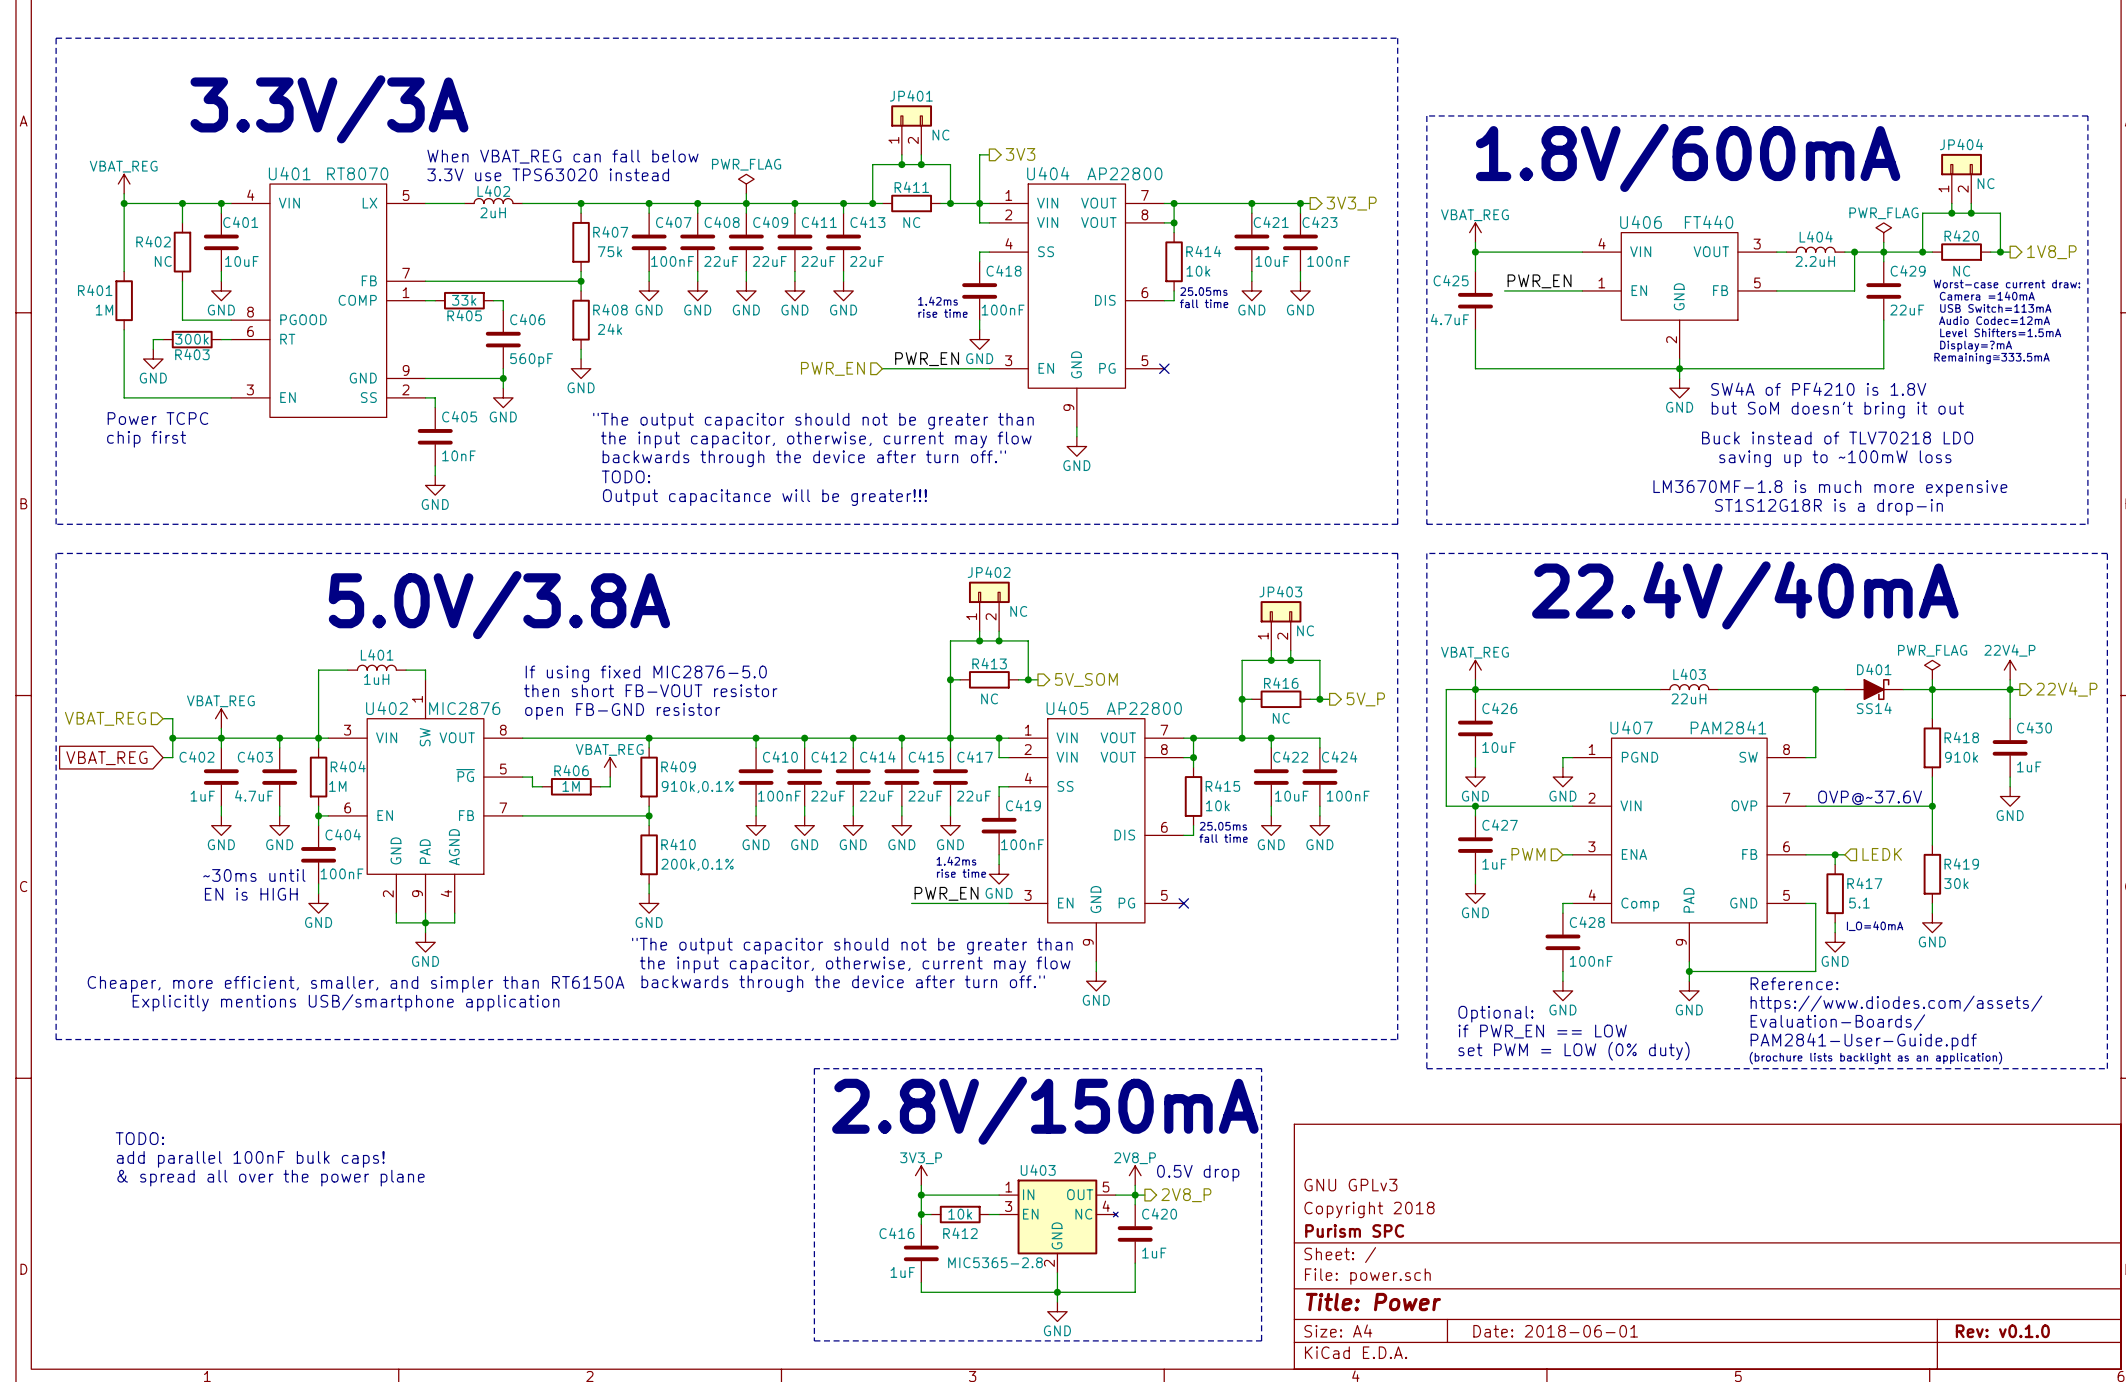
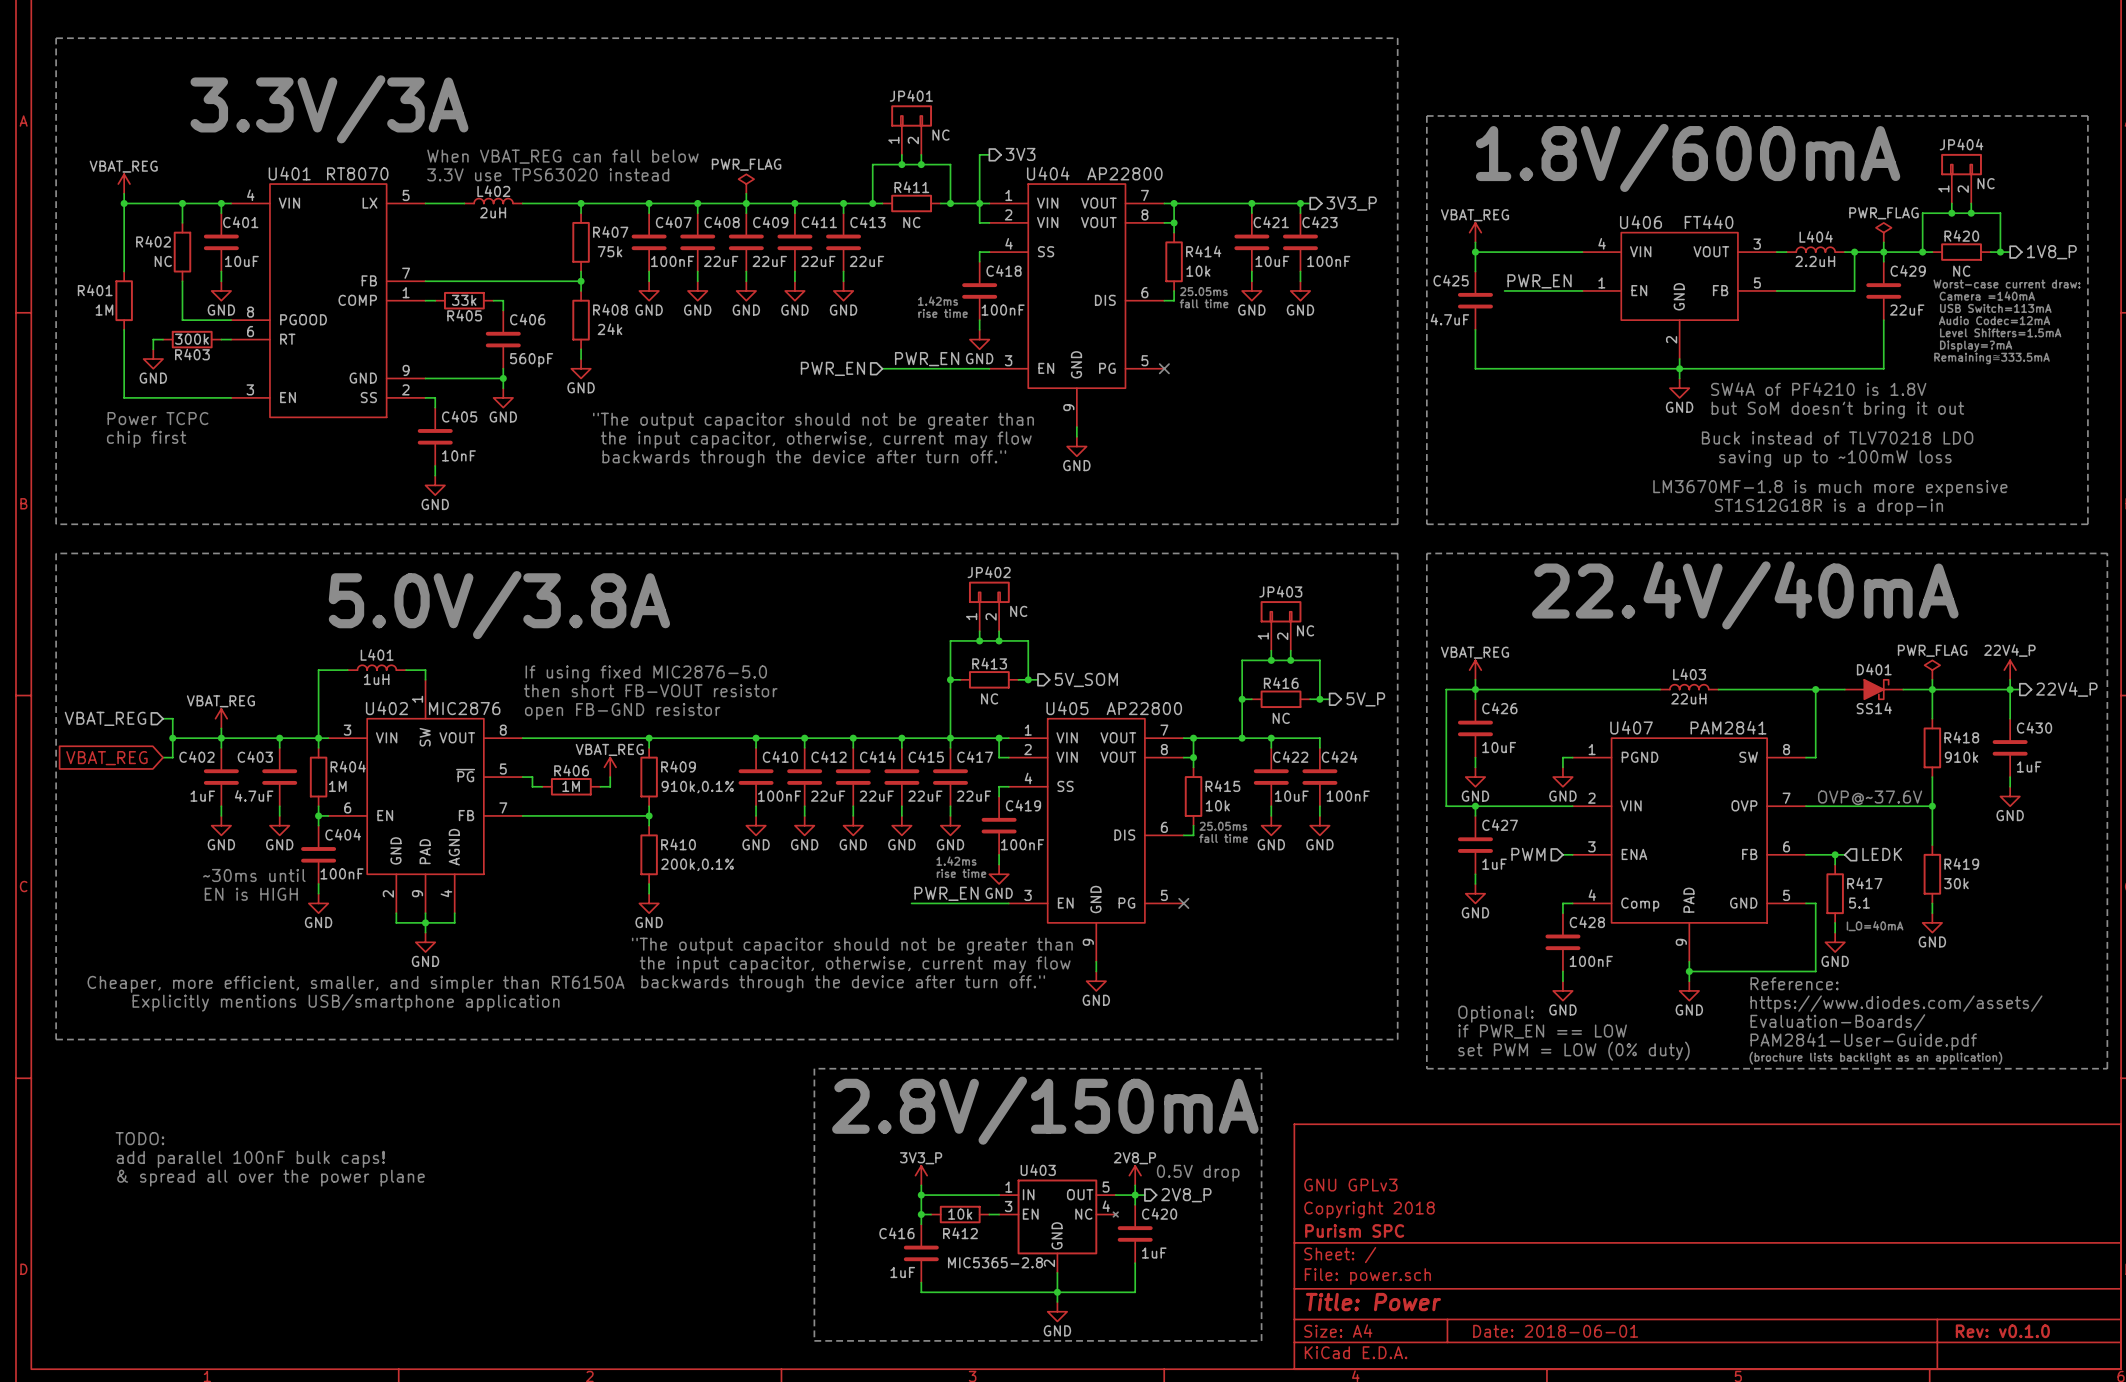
text: TODO: (626, 476) -> none
text: Output capacitance will be greater!!! (764, 497) -> none

